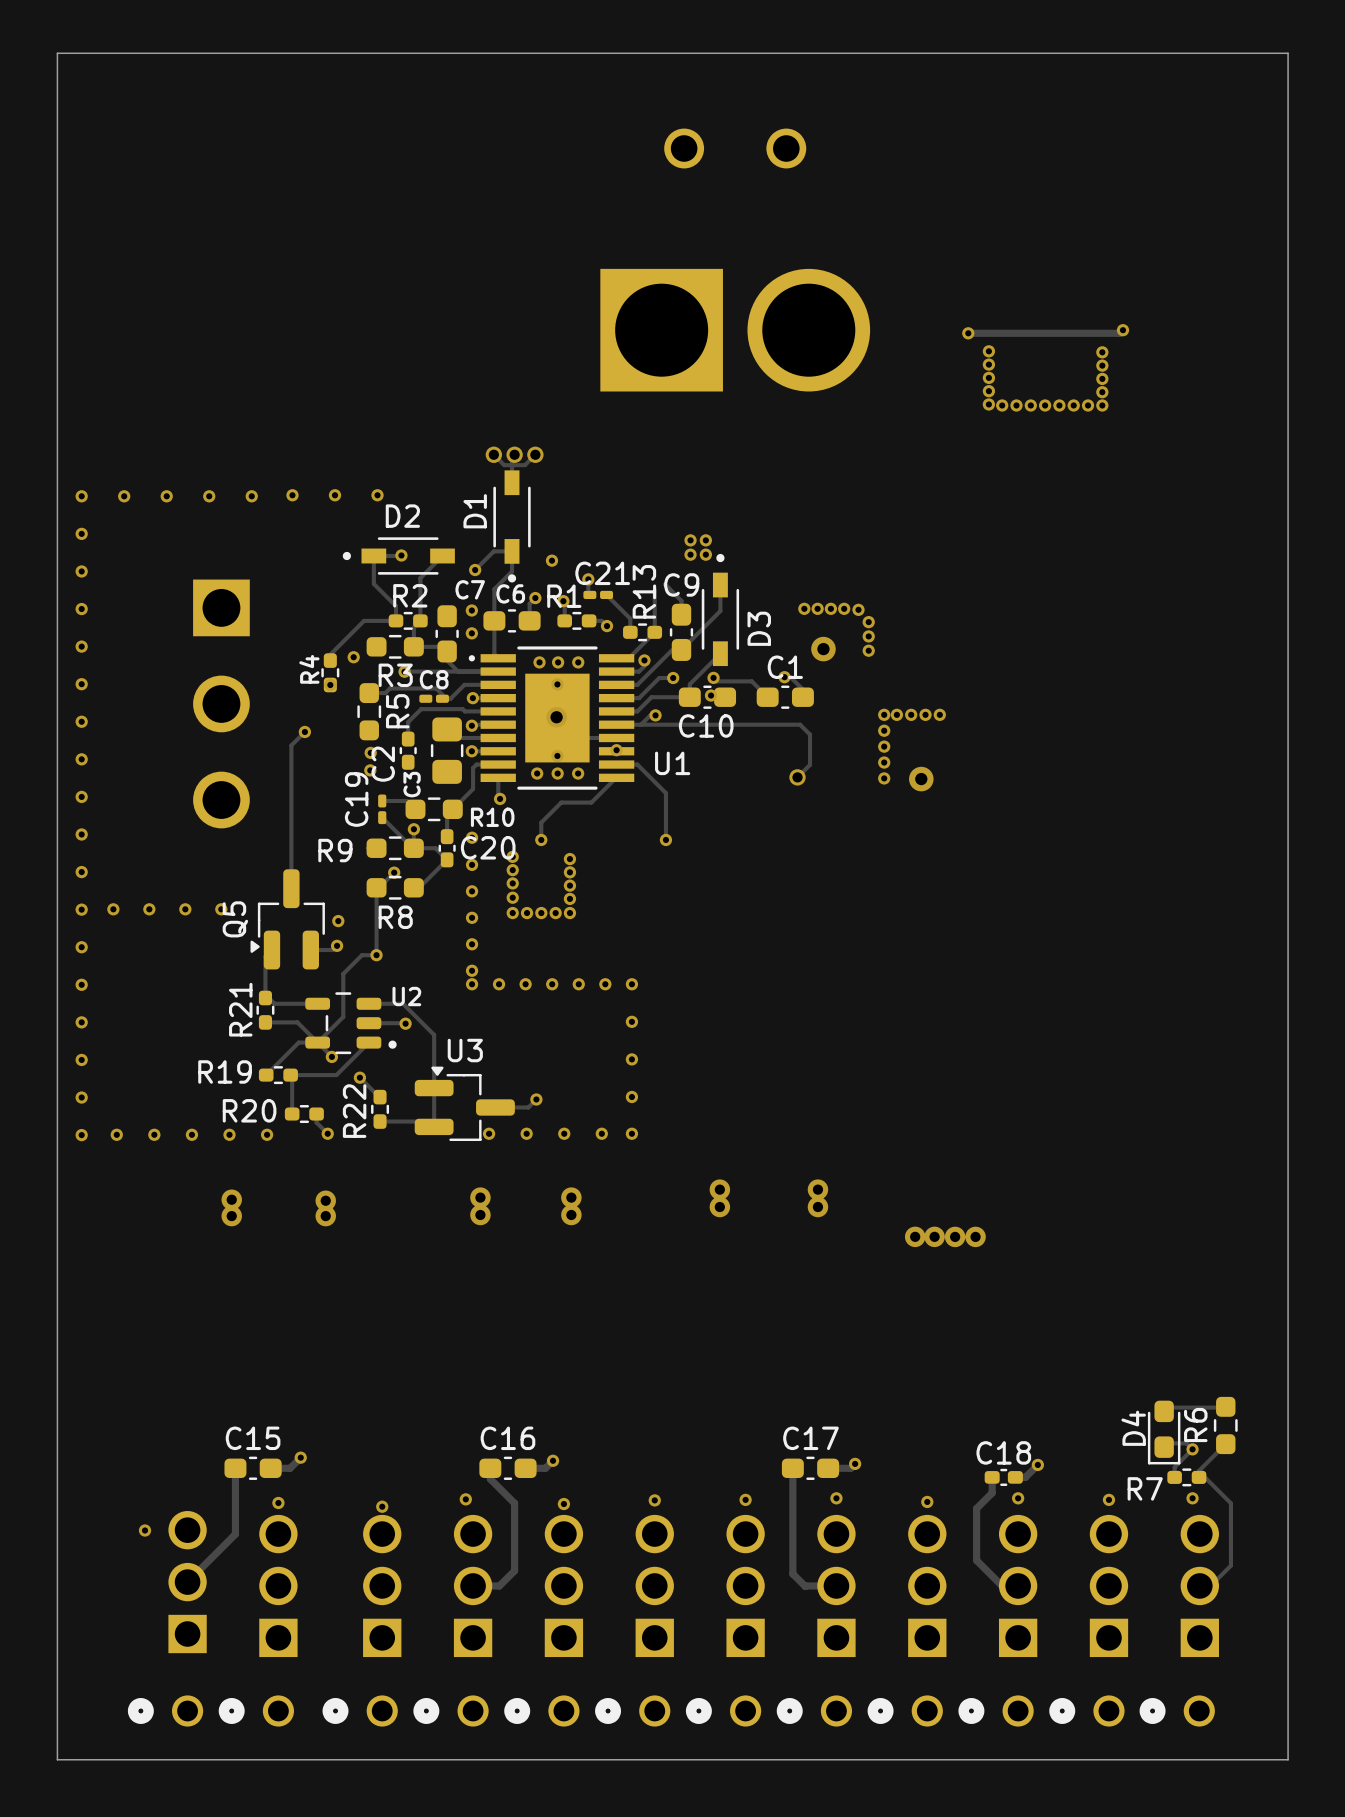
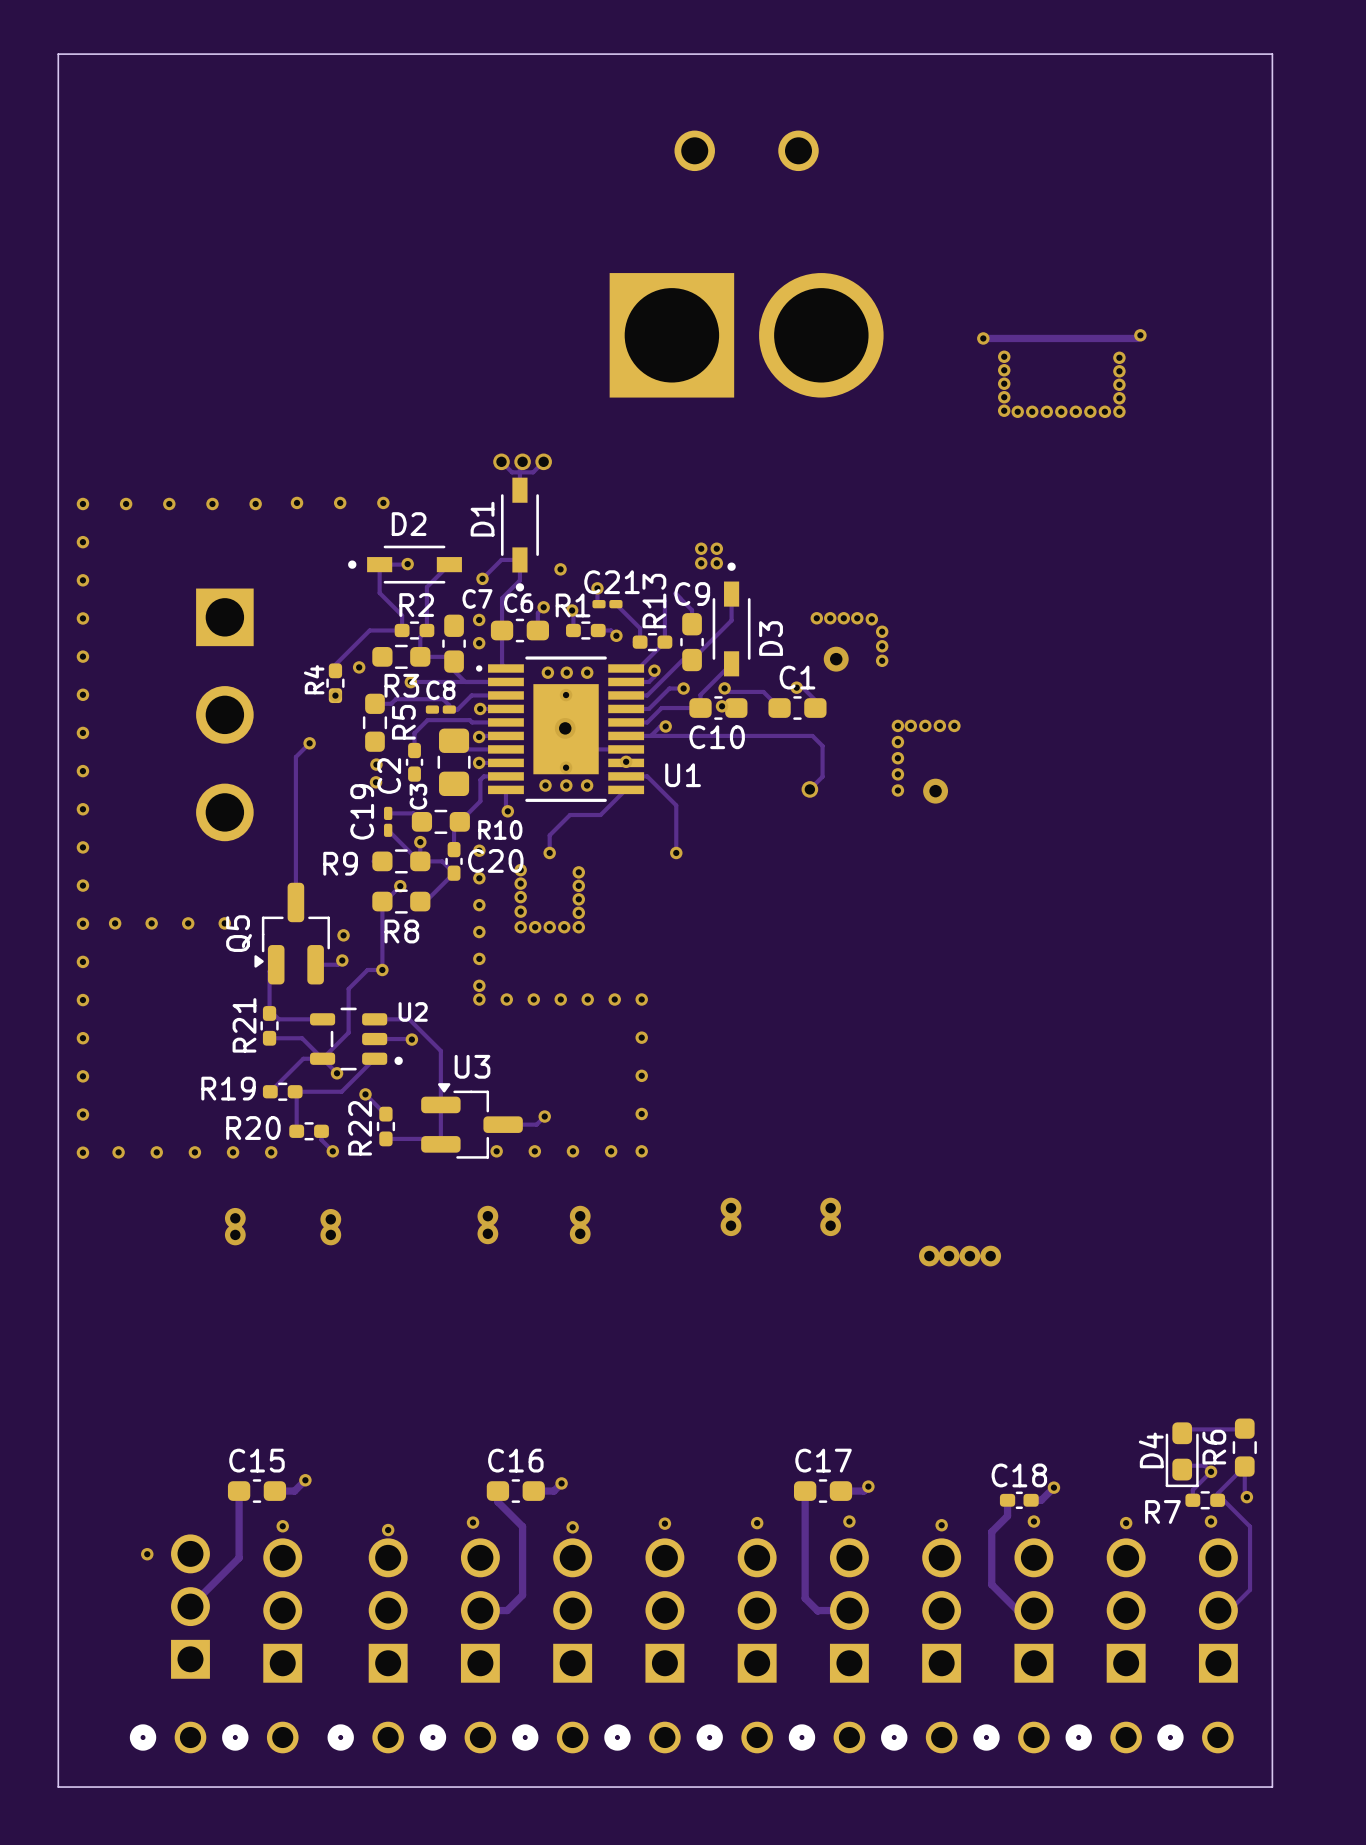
board edge: (1252, 53) (1288, 53) (1288, 1759) (1252, 1759) -> (1272, 54) (1272, 1787)
track: none -> (1244, 1466) (1244, 1495) (1246, 1497)
via: none -> (1246, 1497)

